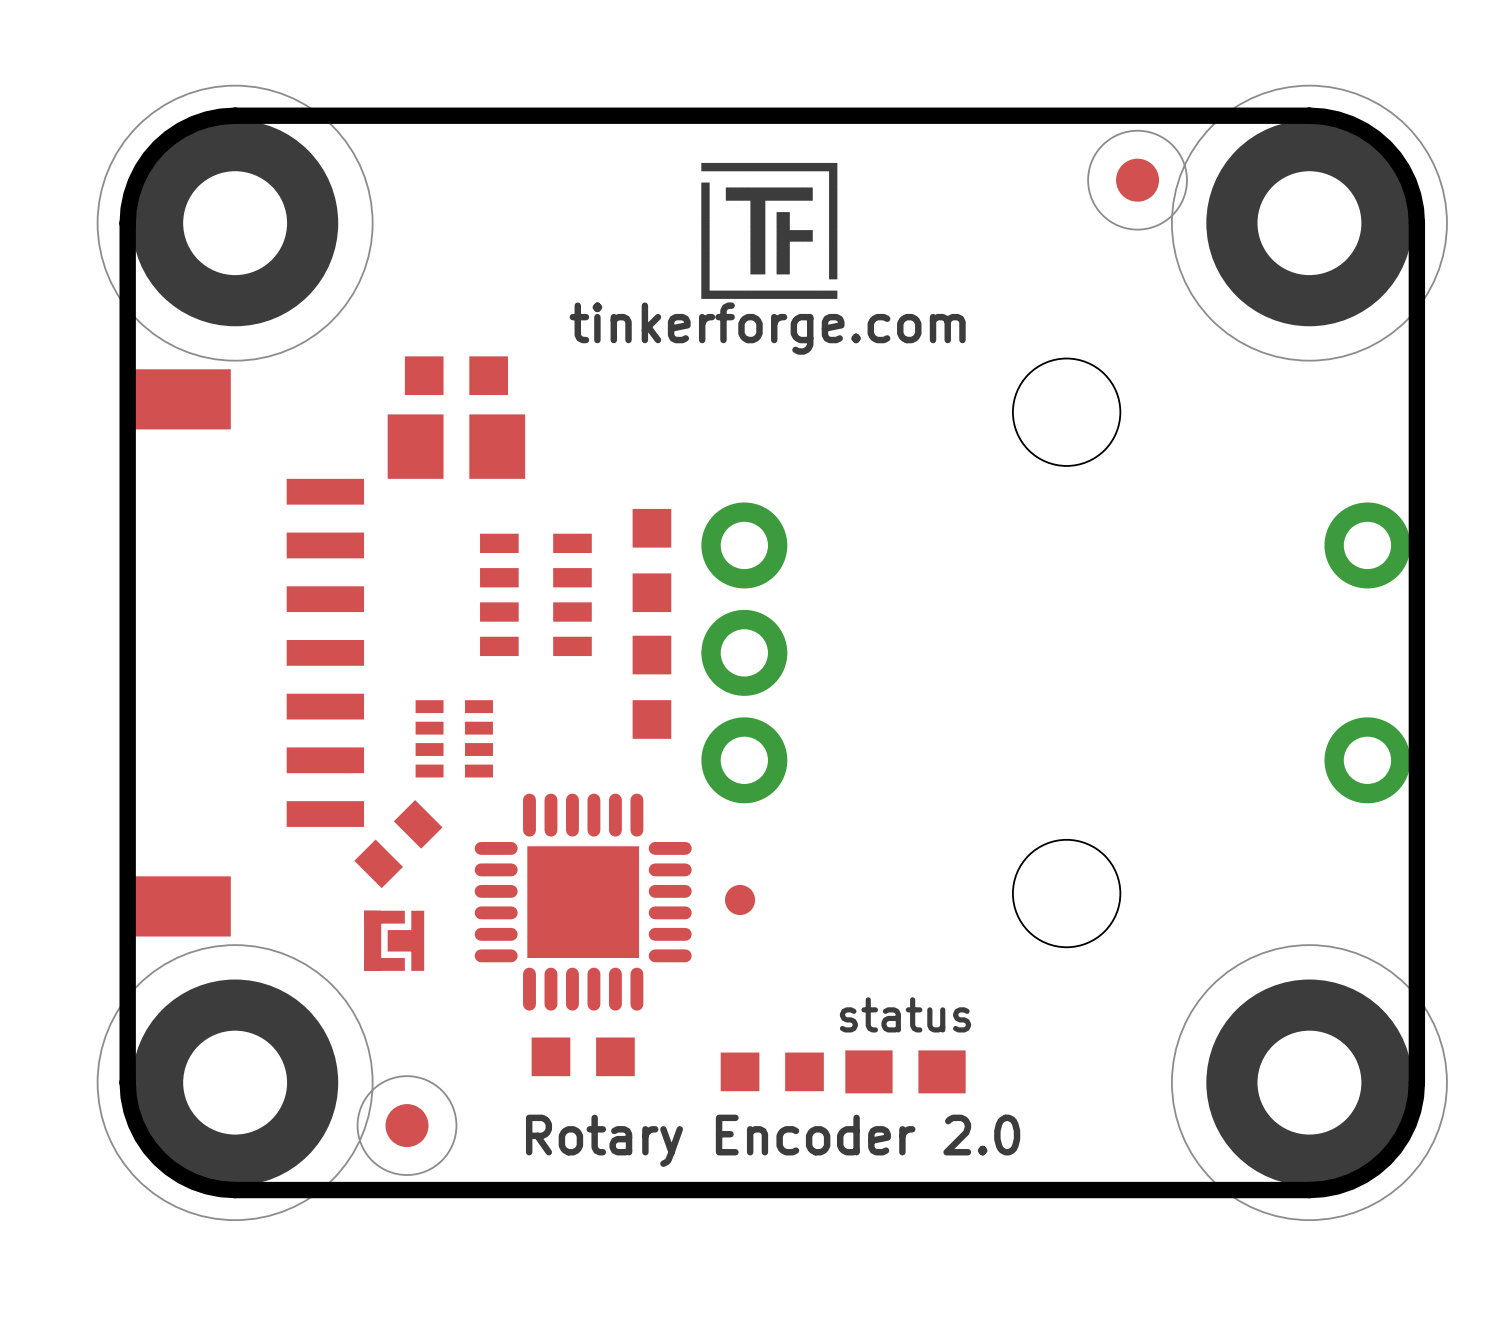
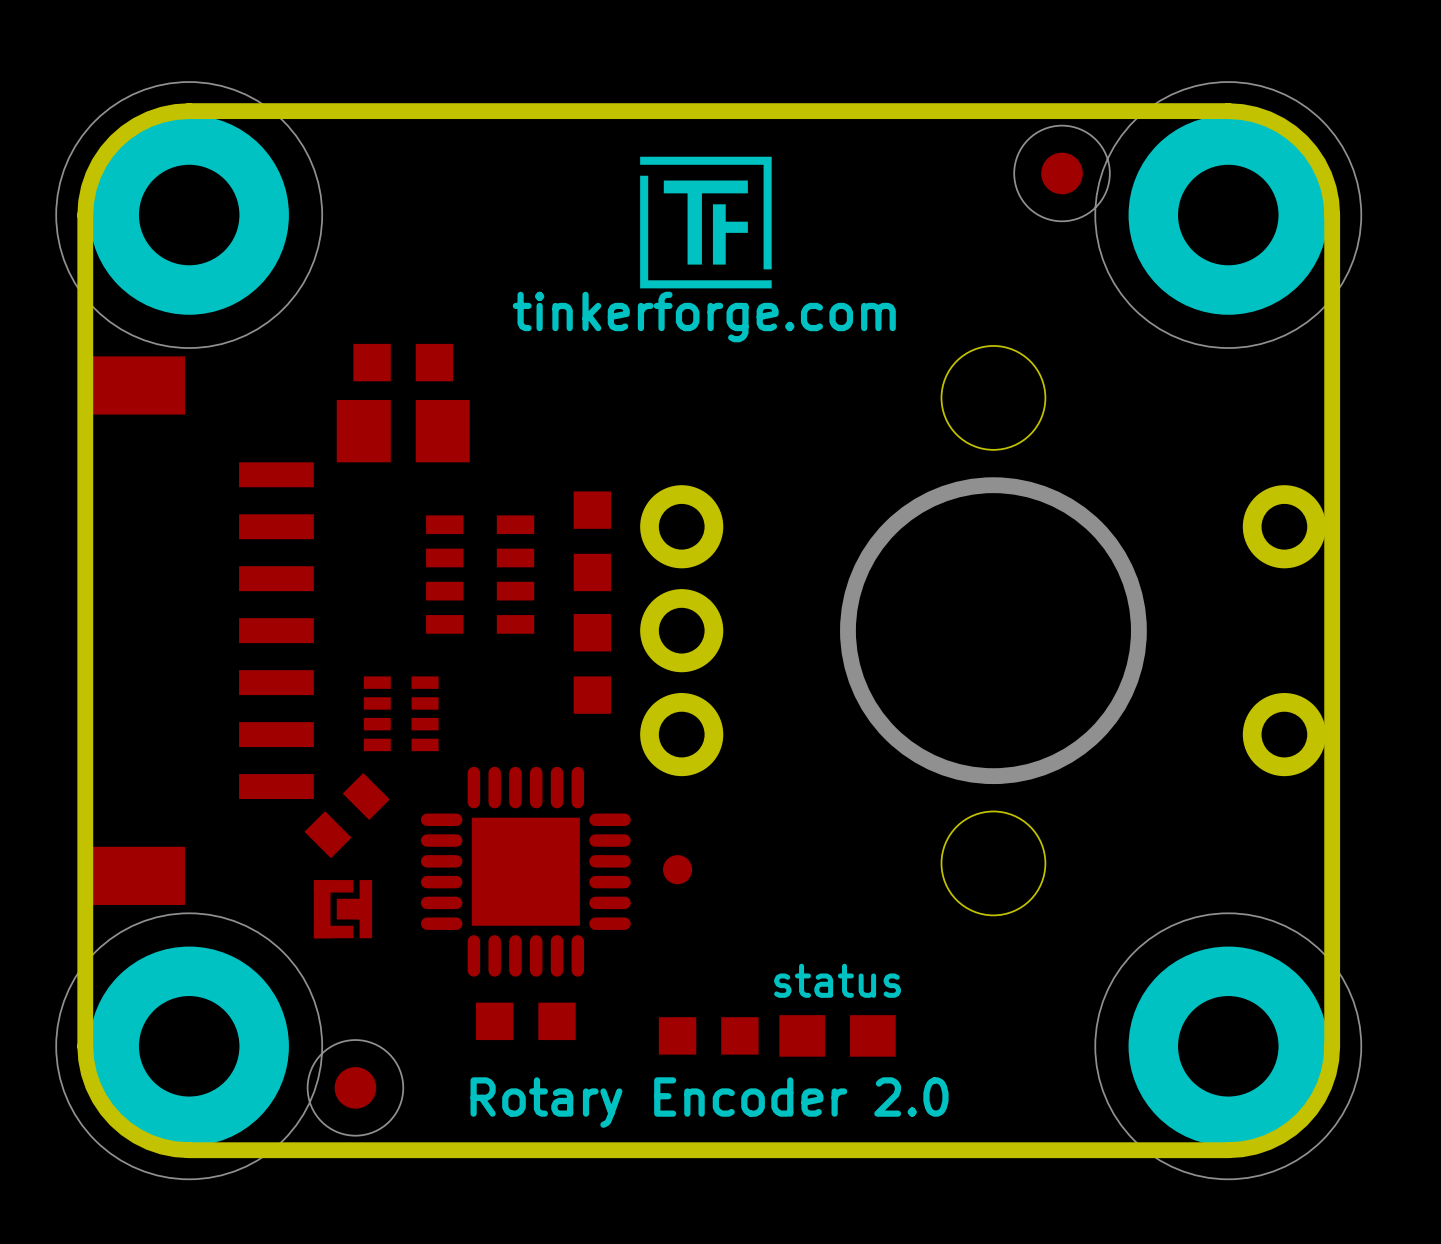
drawing: none -> [840, 477, 1147, 785]

